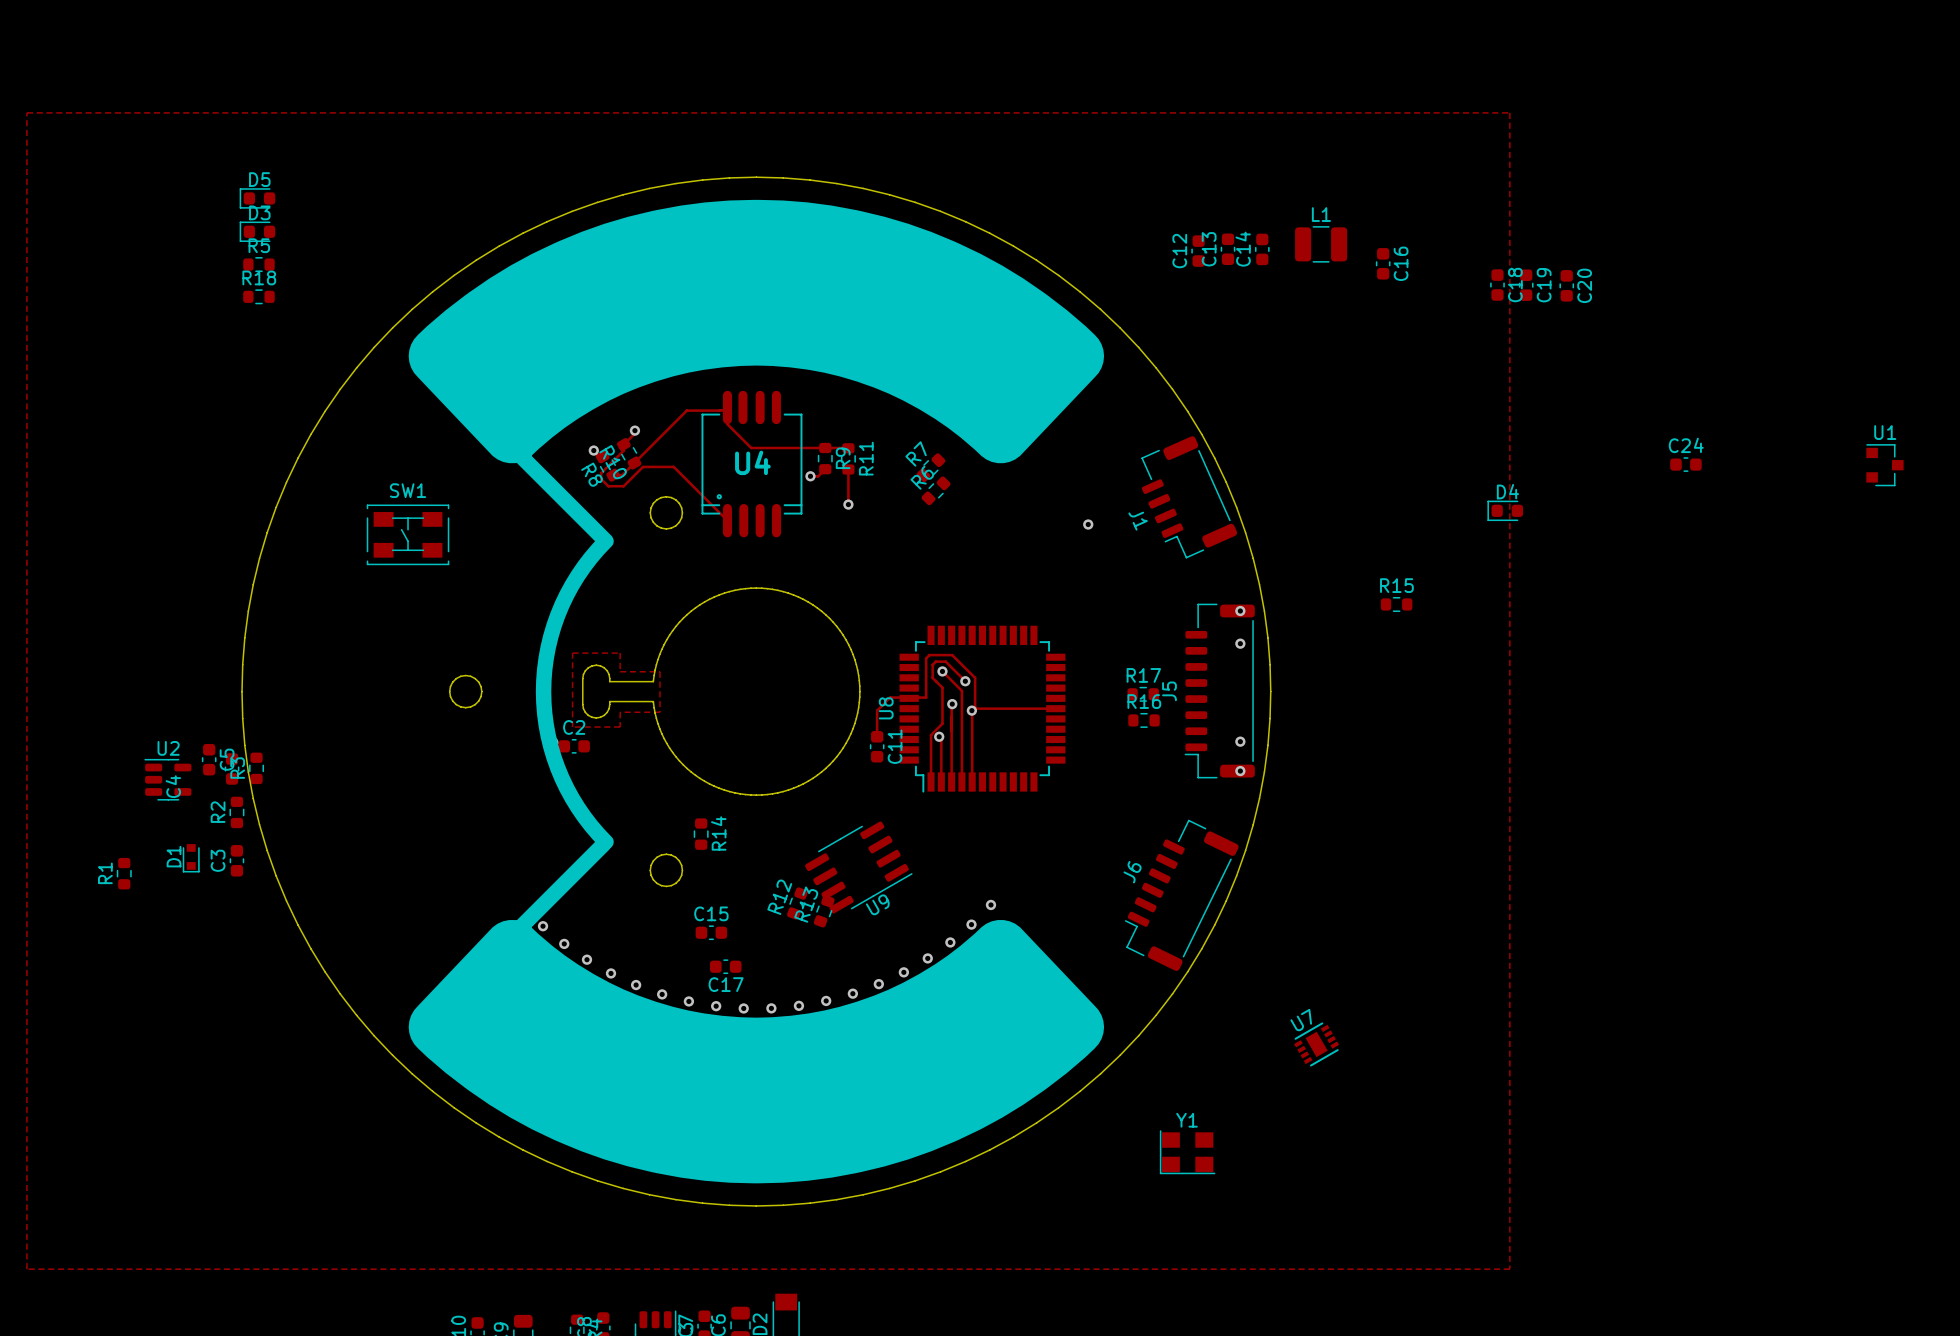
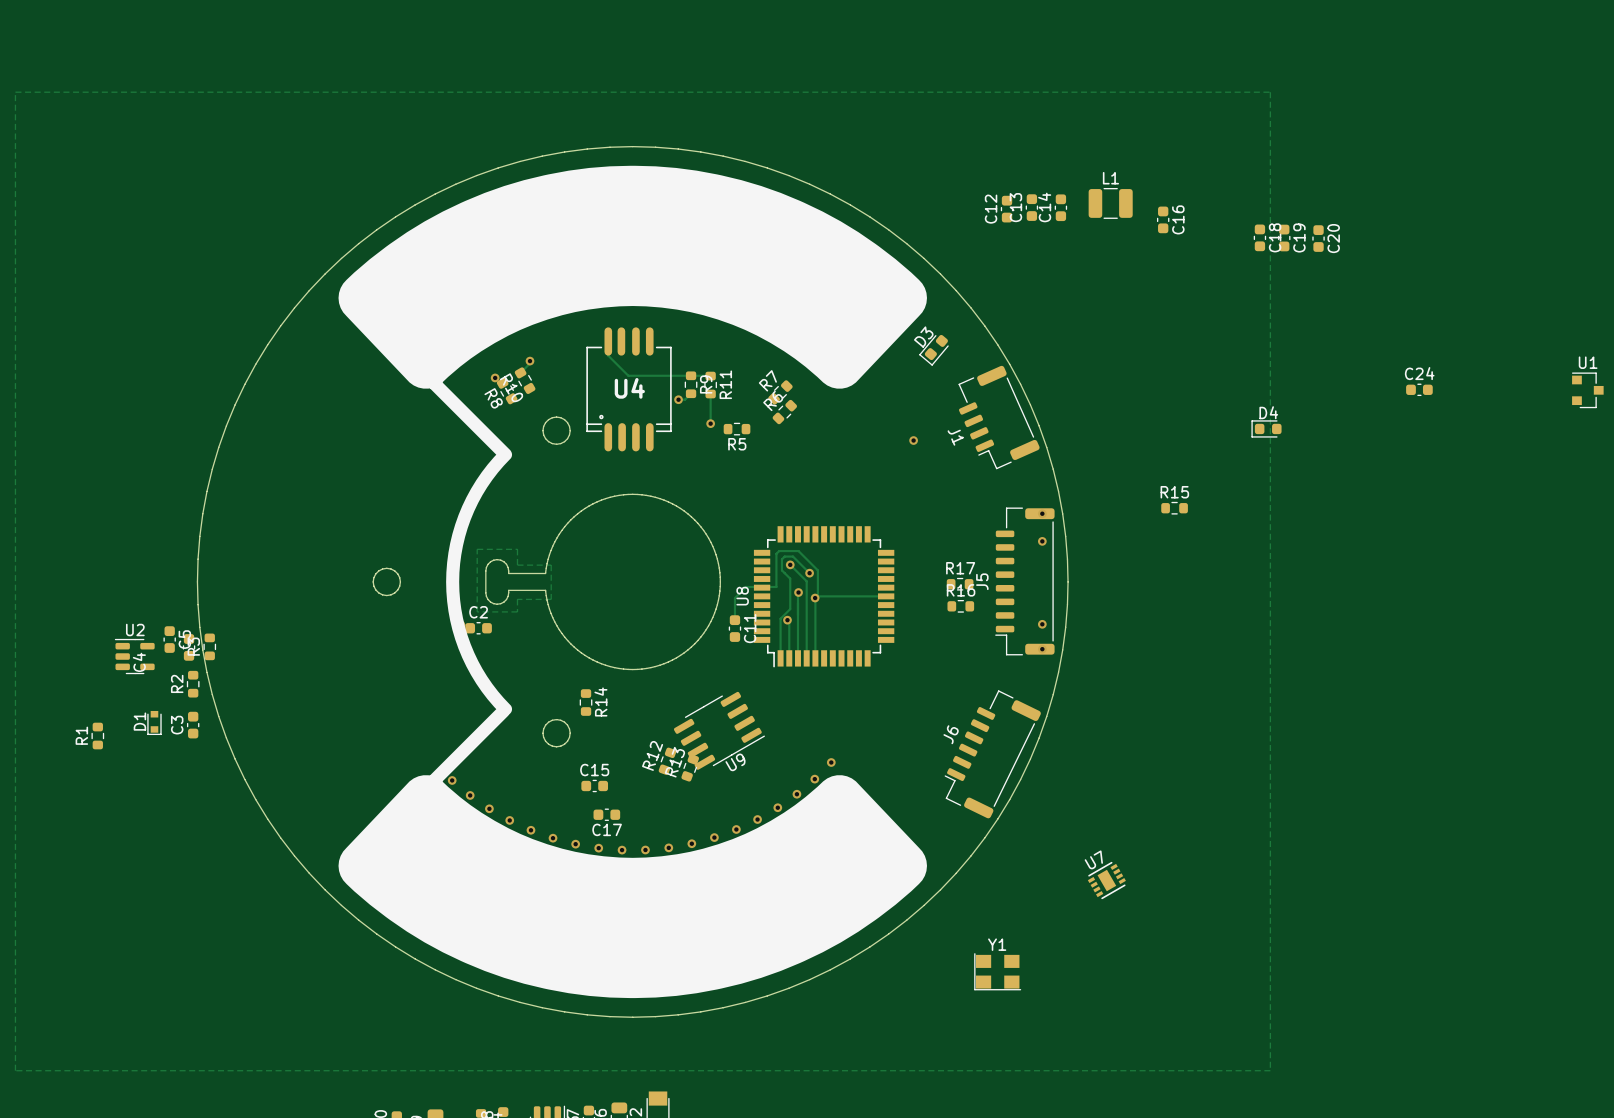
D5: (257, 198) -> none
D3 rotation: 0° (257, 231) -> 50° counterclockwise (933, 350)
D3 position: (257, 231) -> (933, 350)
R5 name position: R5 (259, 245) -> R5 (737, 444)
R5 position: (258, 264) -> (737, 429)
R18: (258, 296) -> none
track: (727, 407) (724, 410) (686, 410) (622, 475) (613, 475) -> none
track: (623, 444) (623, 450) (601, 473) (601, 479) (608, 486) (623, 486) (642, 466) (673, 466) (727, 520) -> none
SW1: (408, 534) -> none

